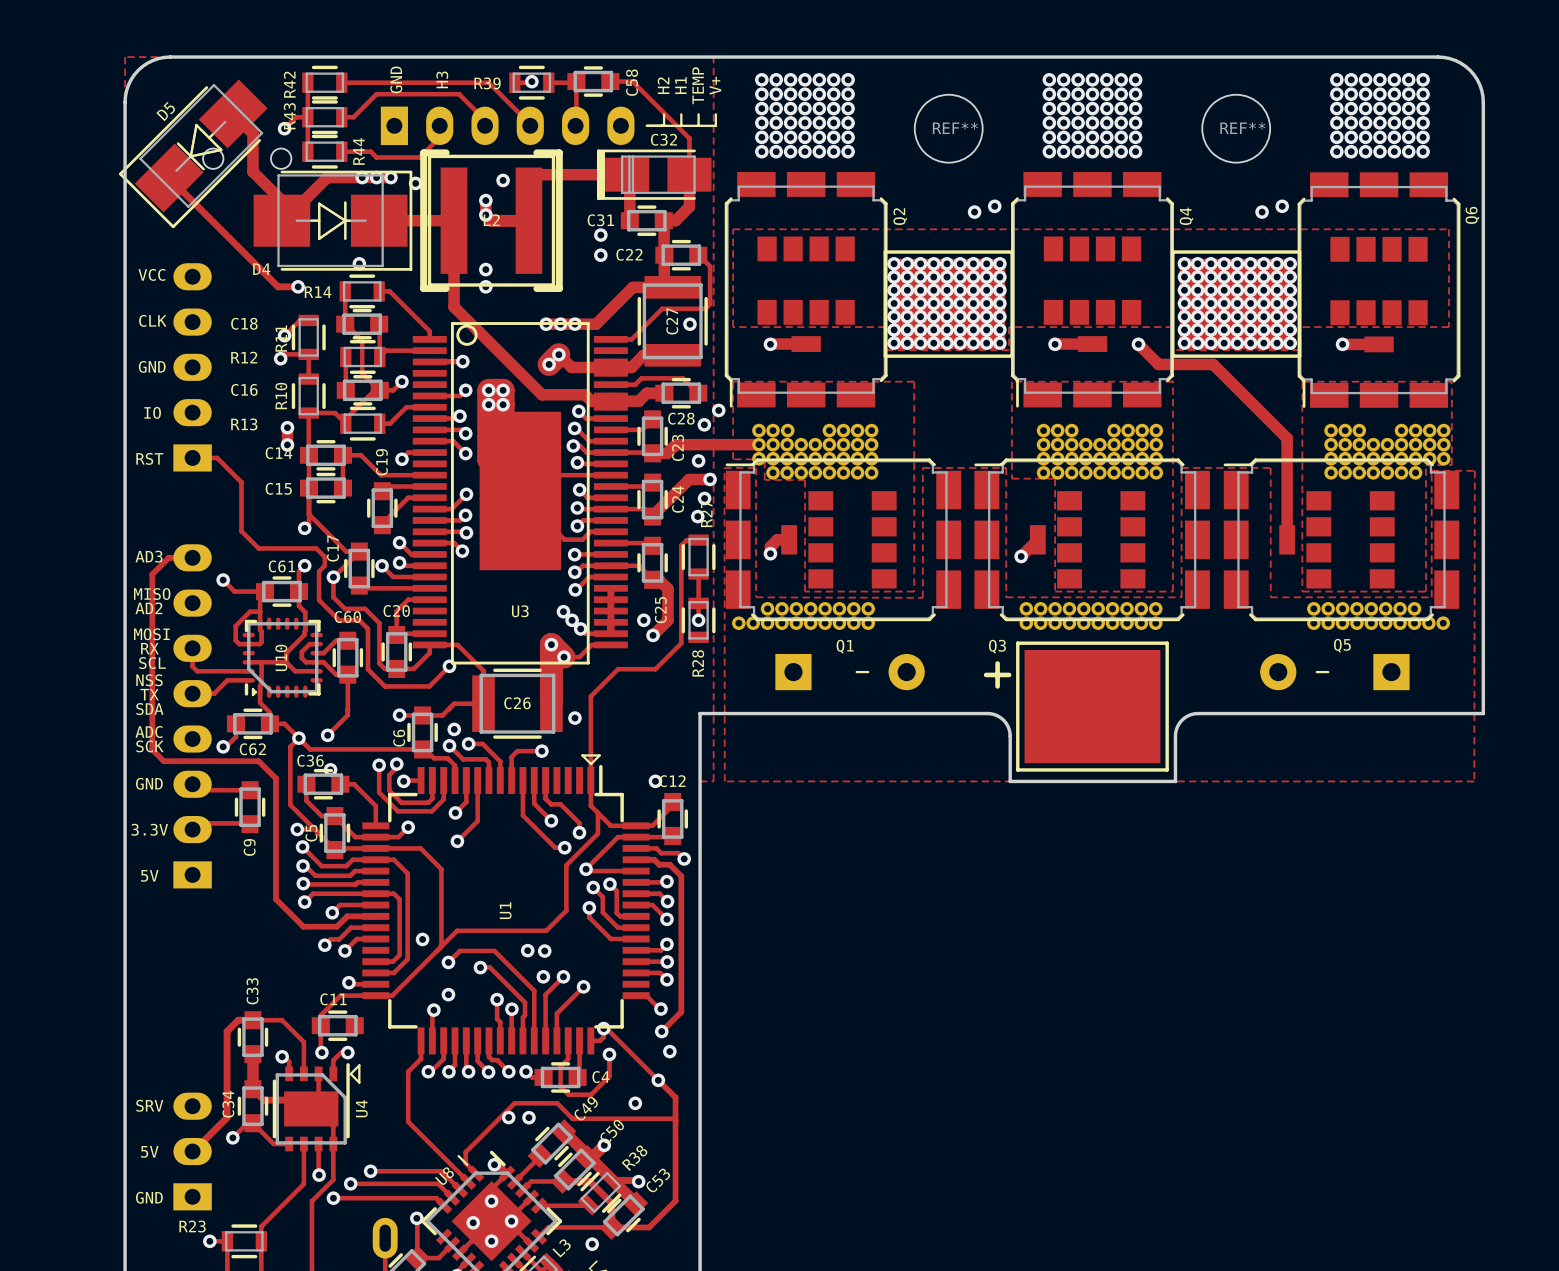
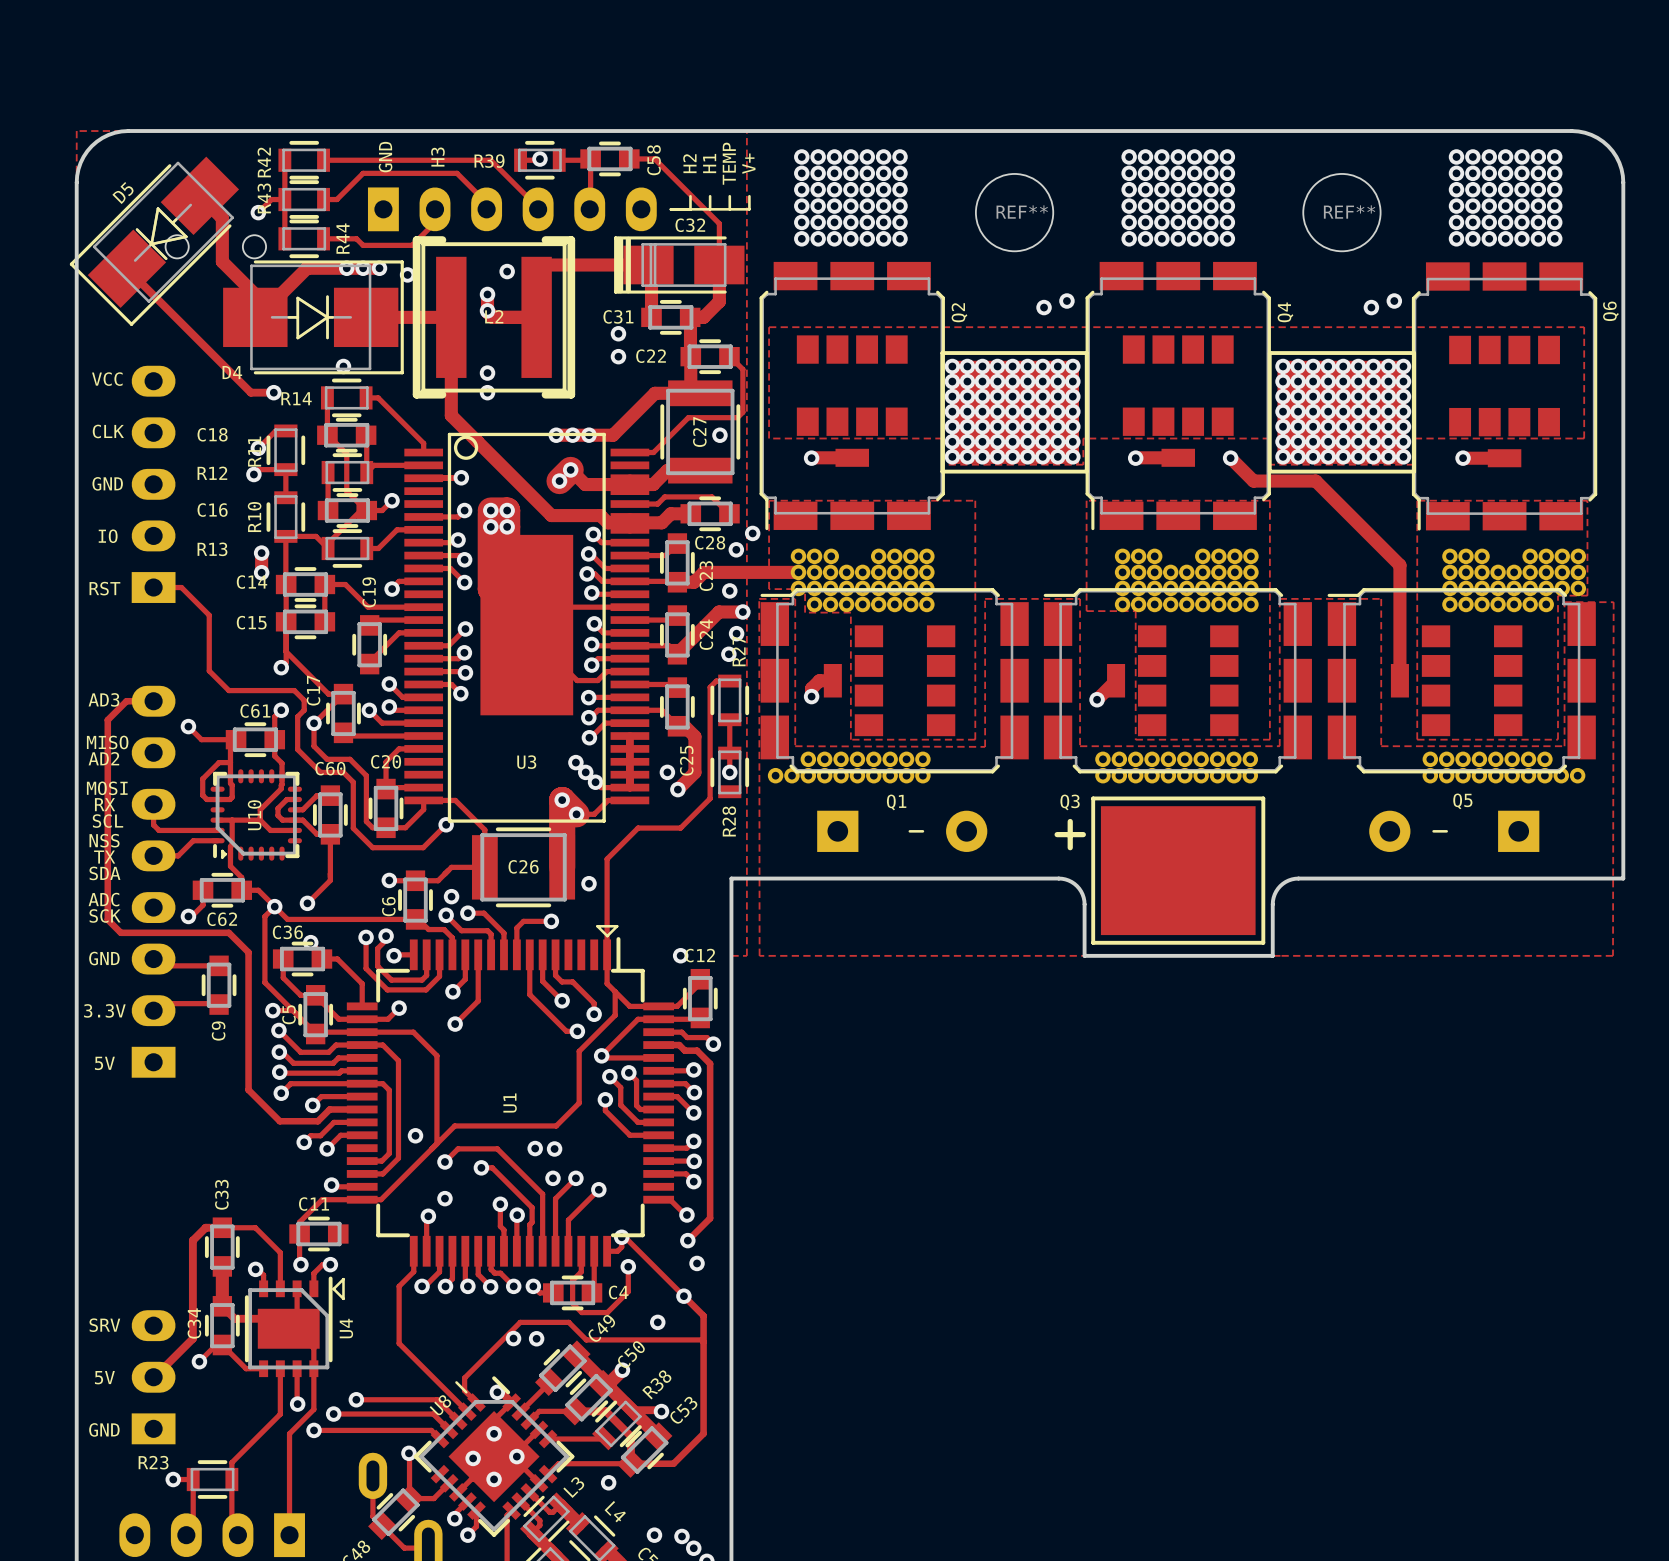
line: none -> (628, 239) (628, 290)

